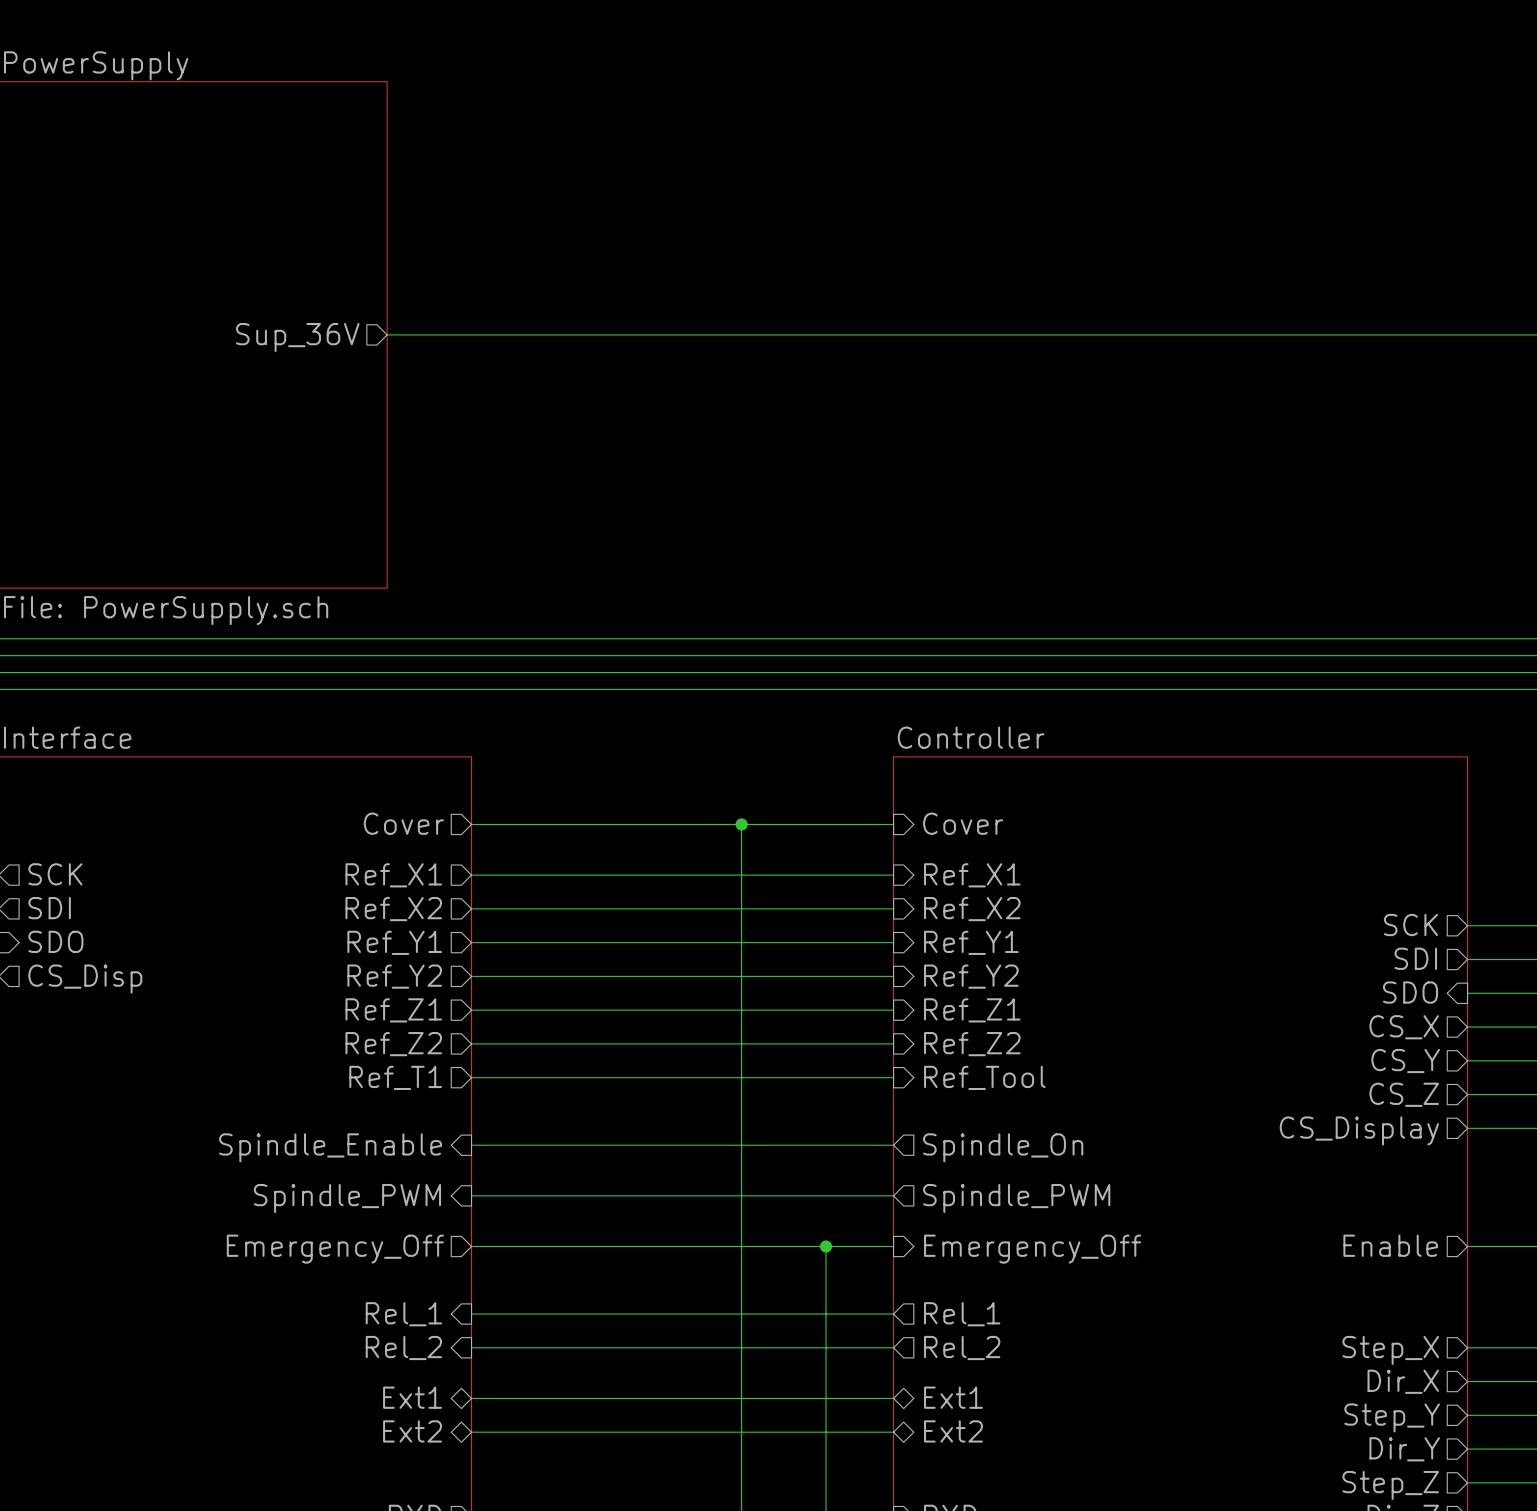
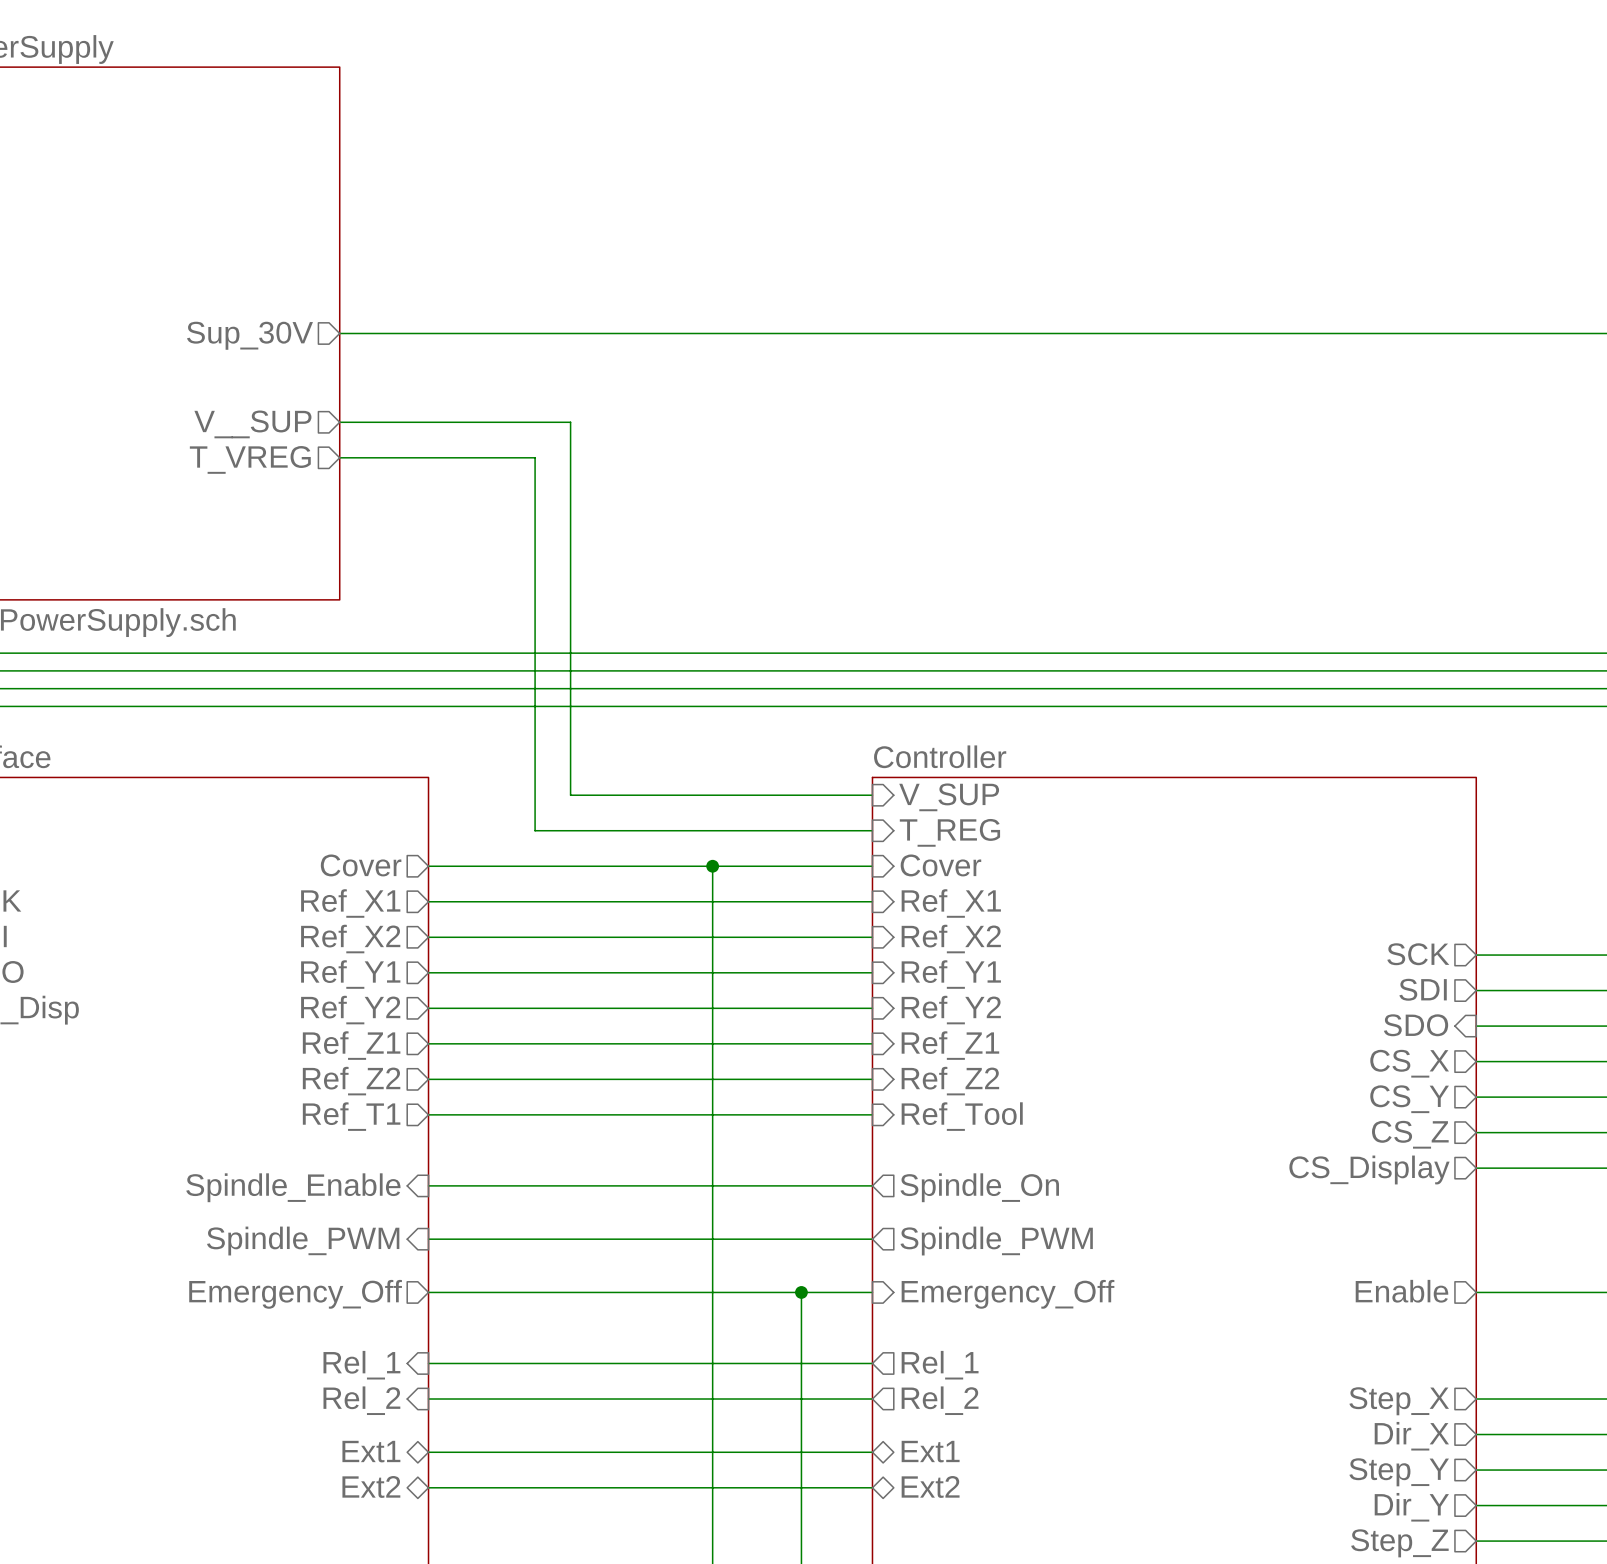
sheet pin: Sup_36V (297, 337) -> Sup_30V (250, 335)
sheet pin: none -> V__SUP (252, 424)
wire: none -> (339, 422) (570, 422) (570, 795) (872, 795)
sheet pin: none -> T_VREG (250, 459)
wire: none -> (339, 457) (535, 457) (535, 830) (872, 830)
sheet pin: none -> V_SUP (949, 797)
sheet pin: none -> T_REG (949, 832)
sheet pin position: Cover (403, 823) -> Cover (361, 865)
sheet pin position: Cover (963, 823) -> Cover (940, 865)
wire: (471, 824) (893, 824) -> (428, 866) (872, 866)
wire: (741, 824) (741, 841) -> none
junction position: (741, 824) -> (712, 866)

